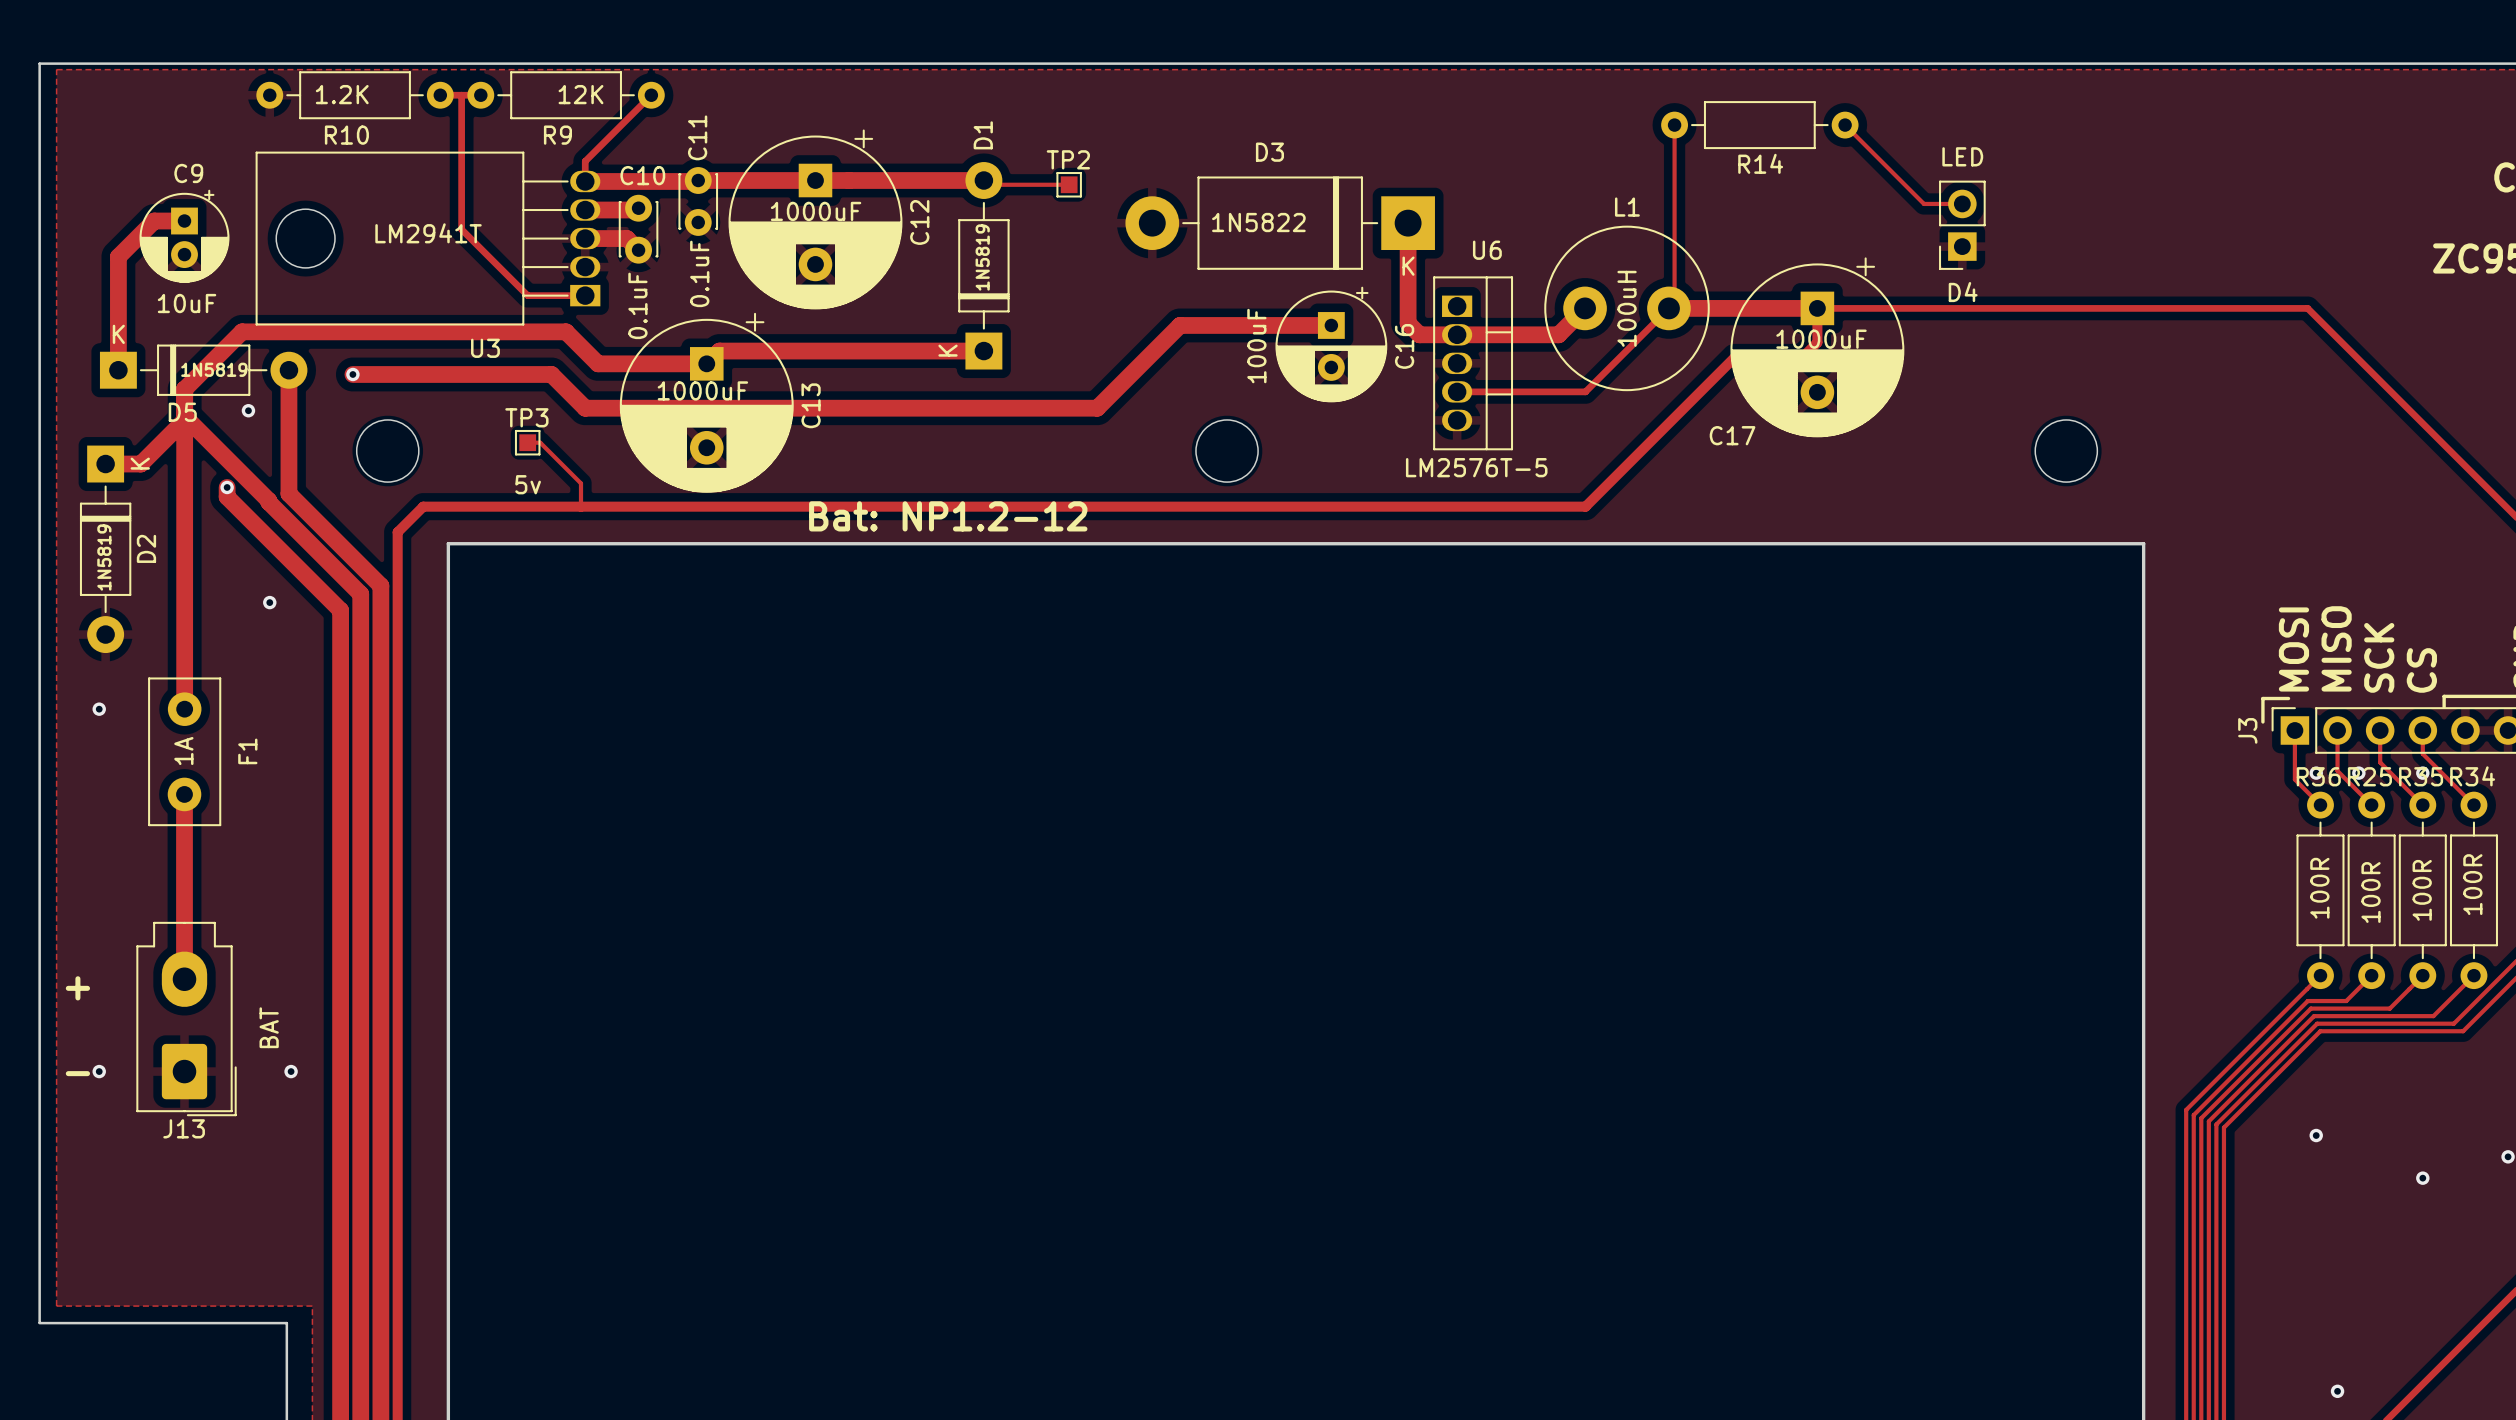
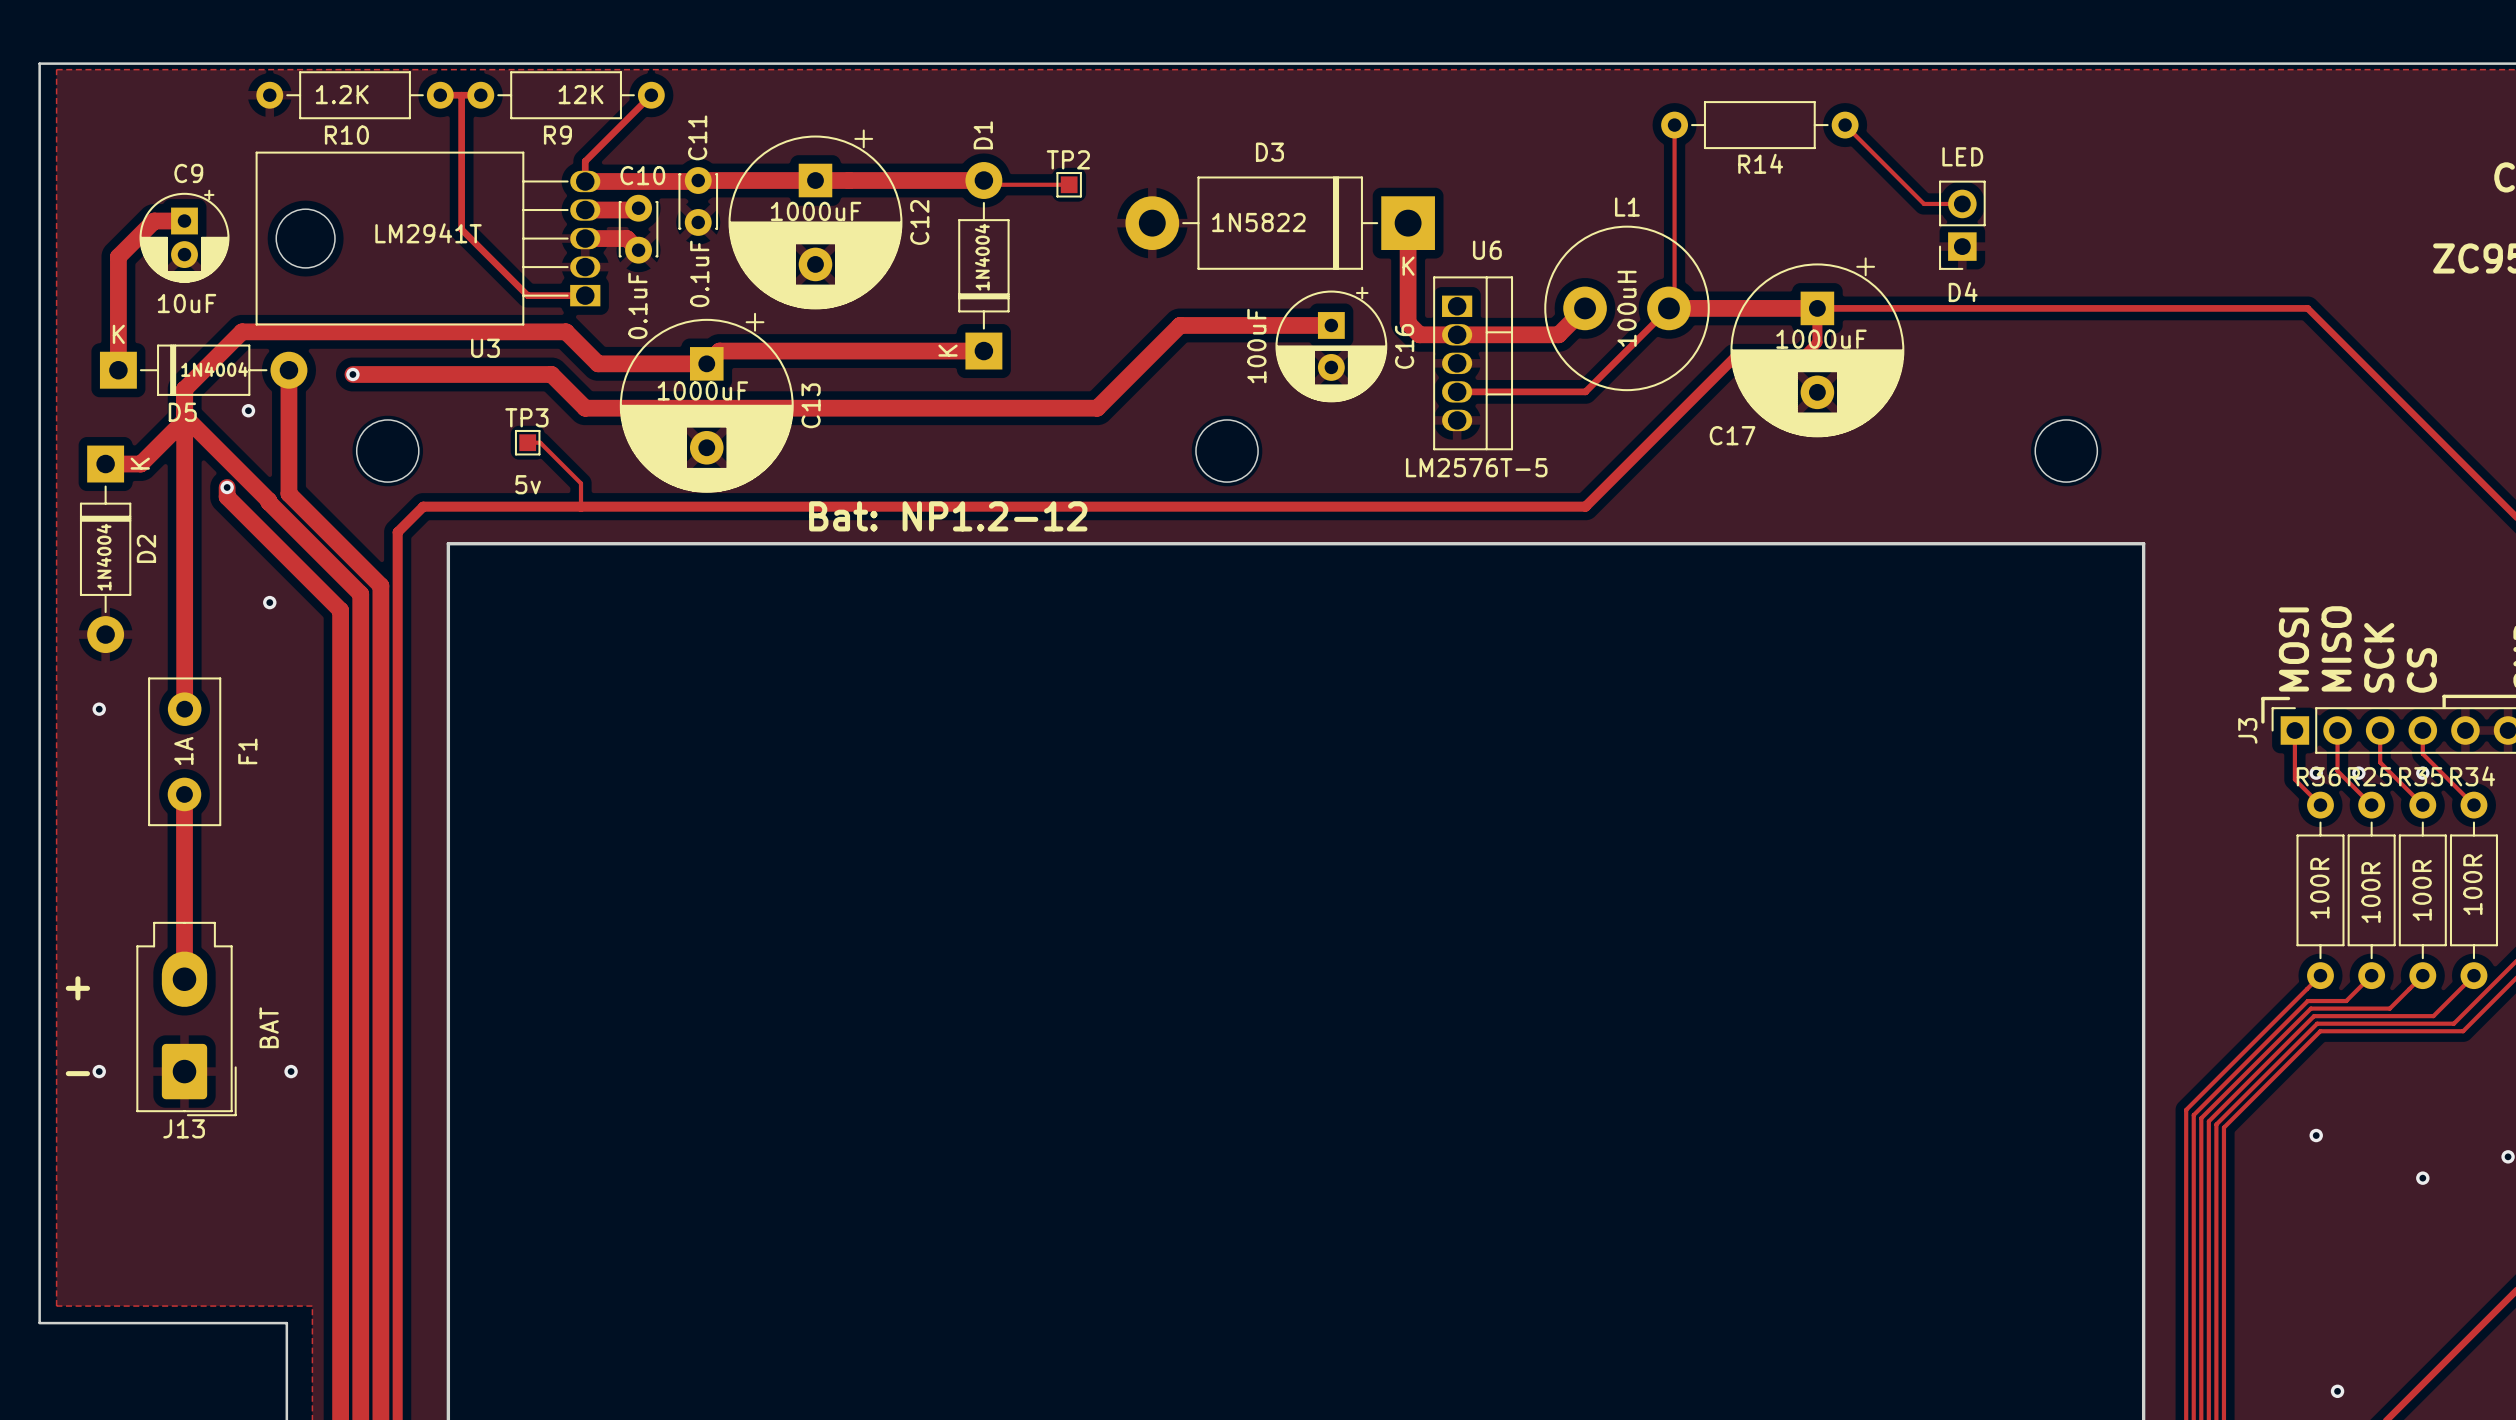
D1 value: 1N5819 (982, 257) -> 1N4004 (982, 257)
D5 value: 1N5819 (214, 369) -> 1N4004 (214, 369)
D2 value: 1N5819 (104, 557) -> 1N4004 (104, 557)

